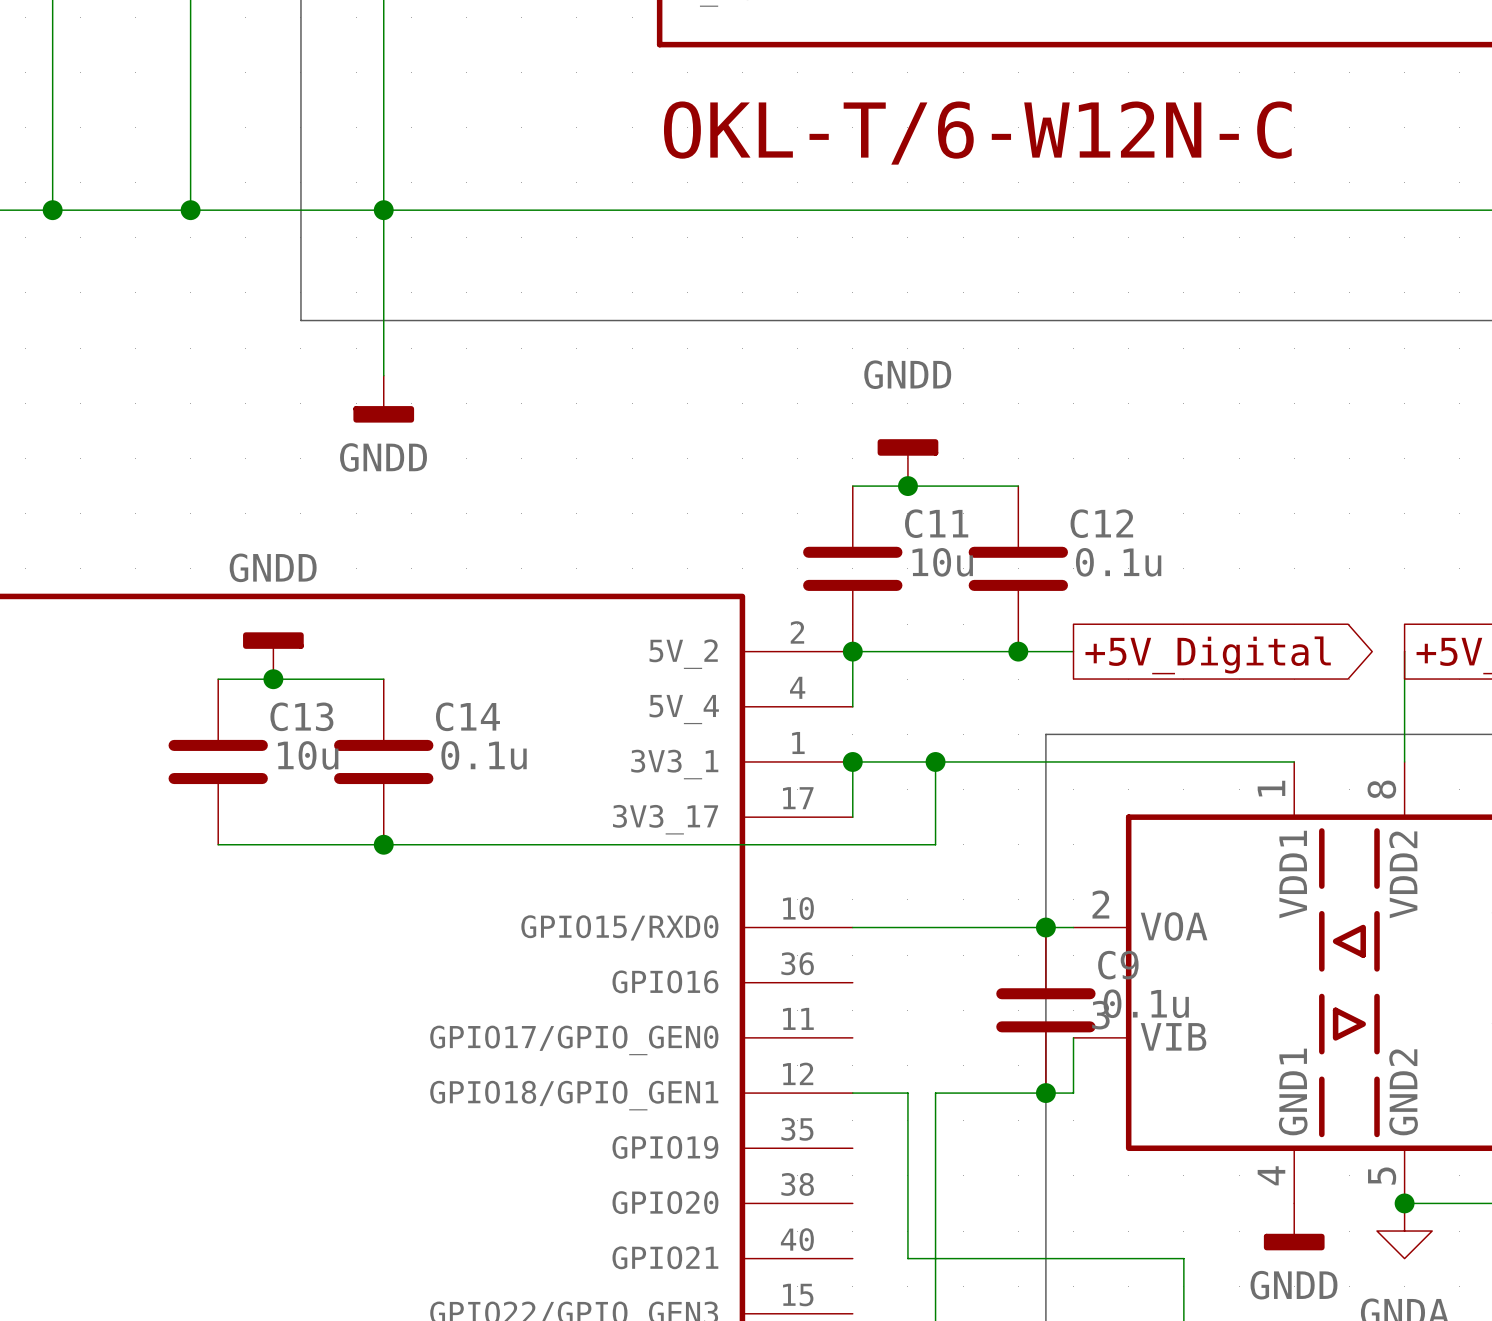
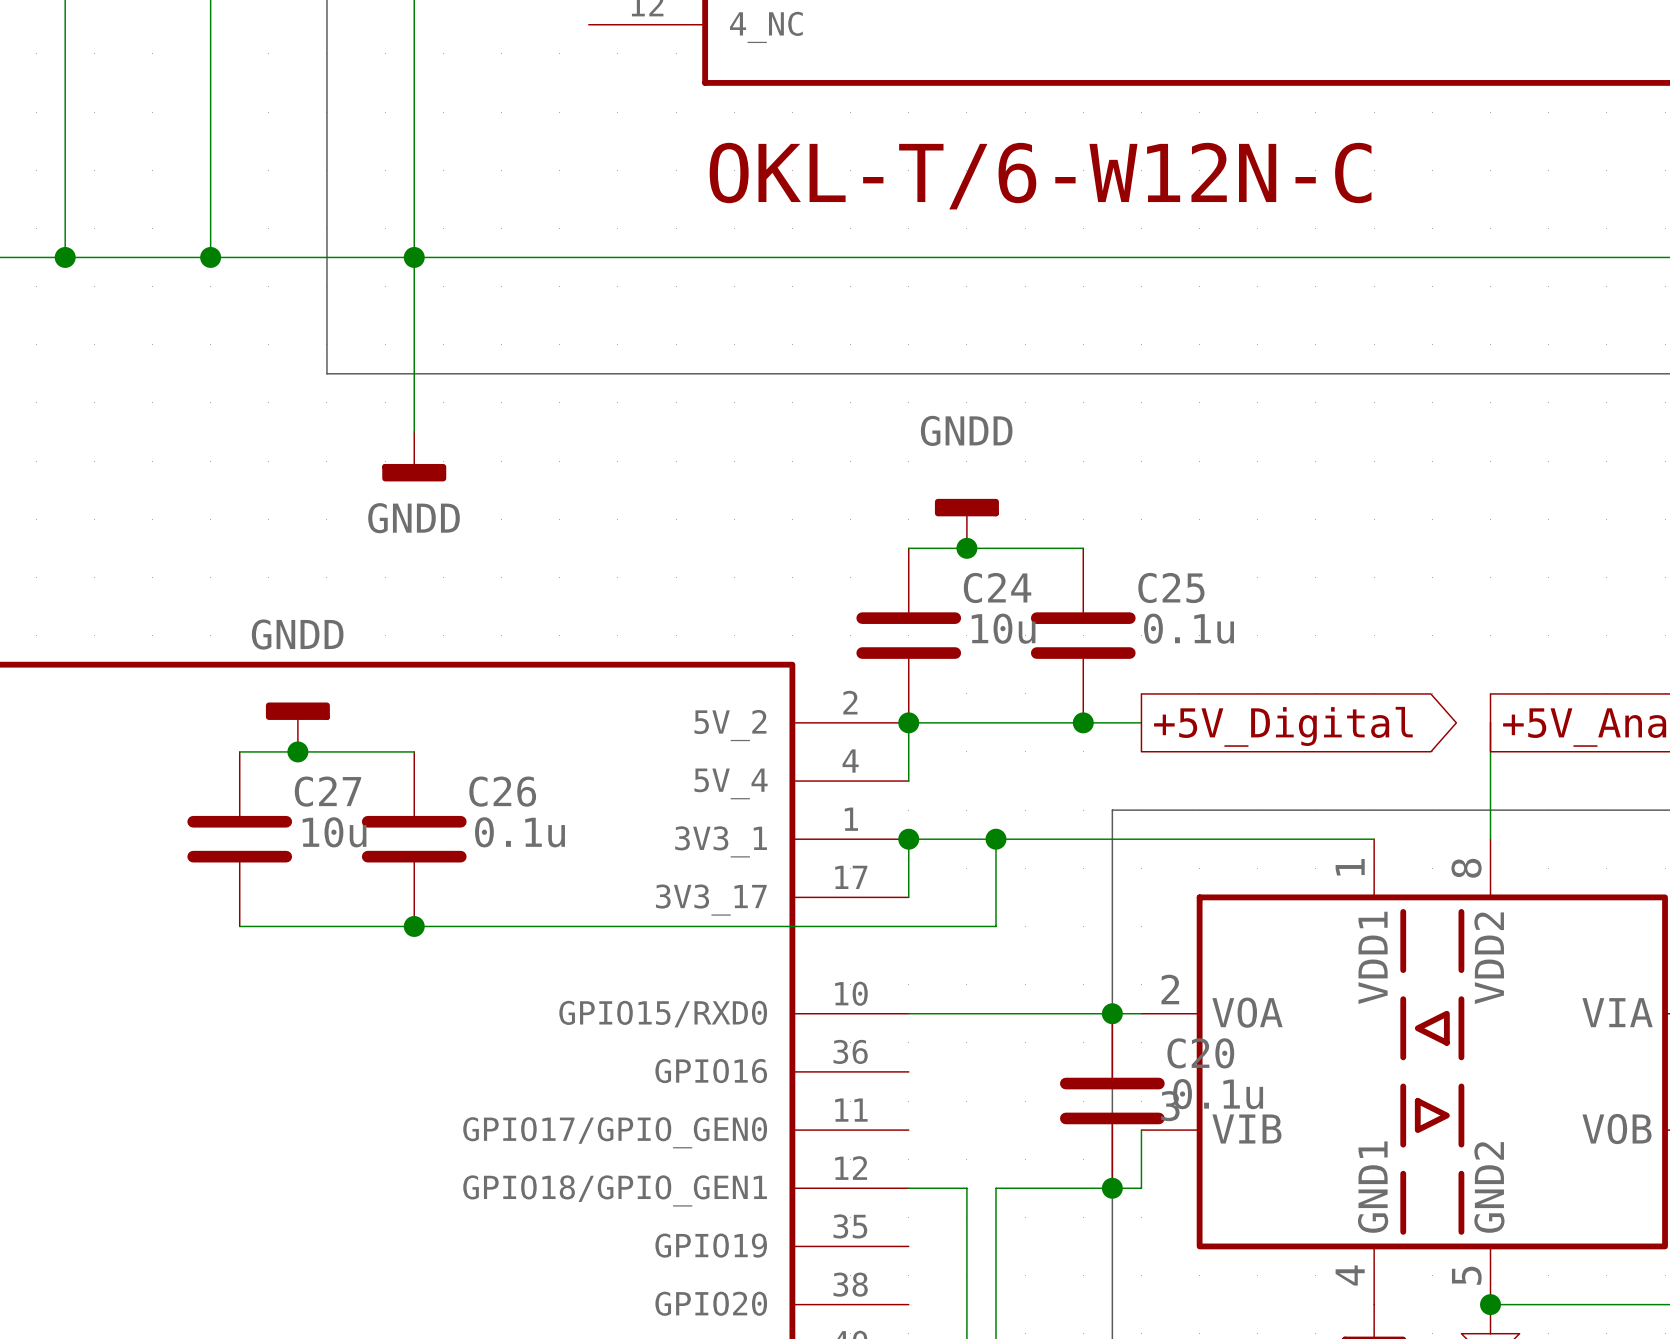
C11 name: C11 (936, 523) -> C24 (997, 587)
C12 name: C12 (1101, 523) -> C25 (1171, 587)
C13 name: C13 (301, 716) -> C27 (327, 791)
C14 name: C14 (467, 716) -> C26 (502, 791)
C9 name: C9 (1118, 965) -> C20 (1200, 1053)

